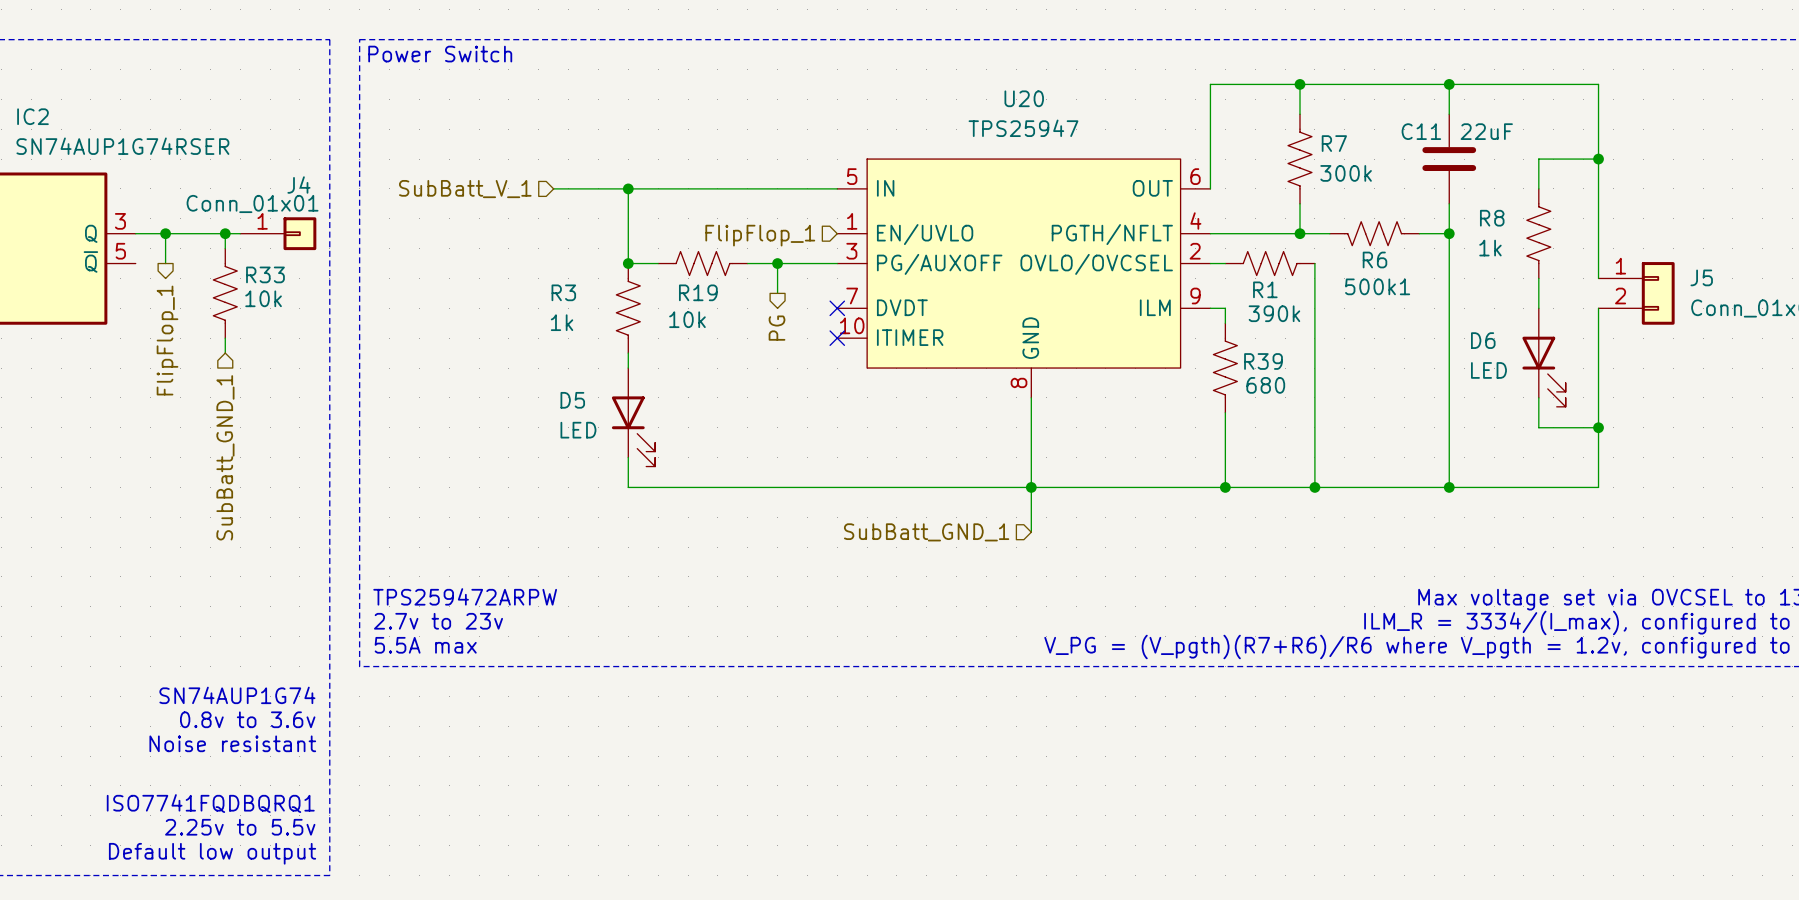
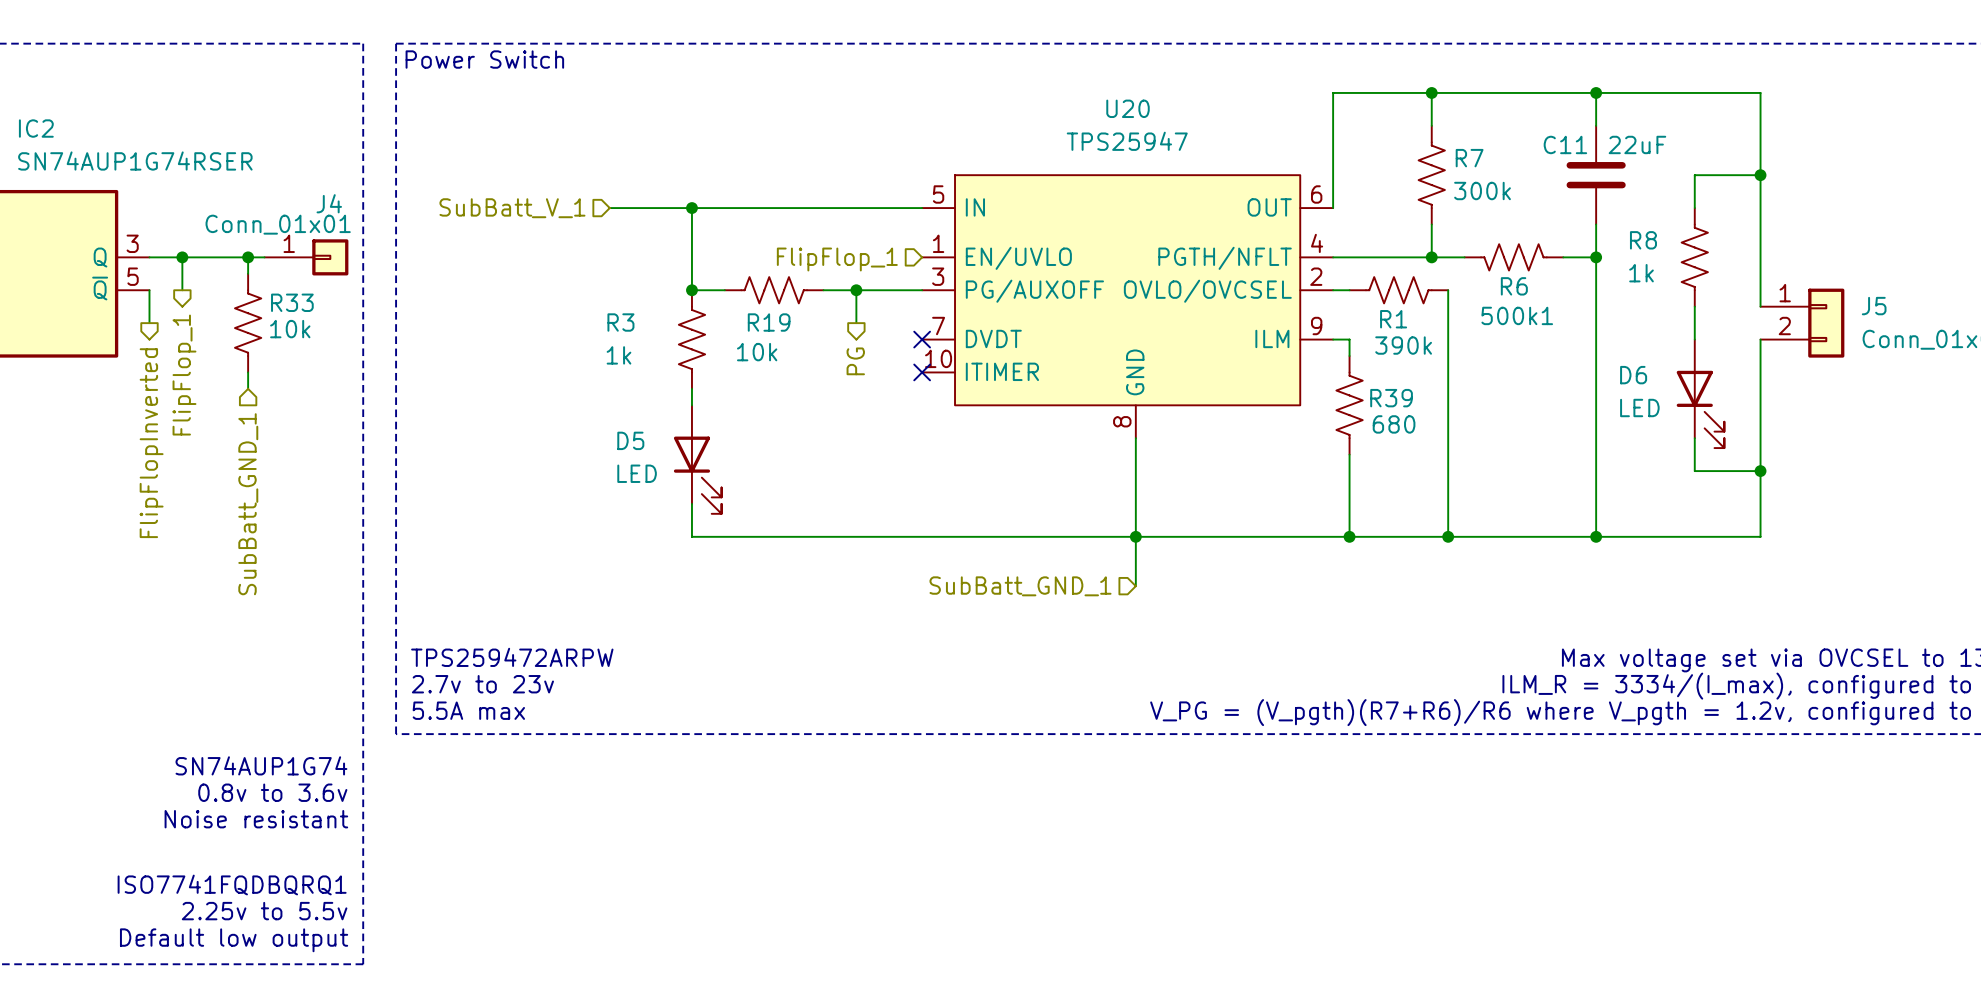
wire: none -> (149, 290) (149, 323)
hierarchical label: none -> FlipFlopInverted (151, 443)

